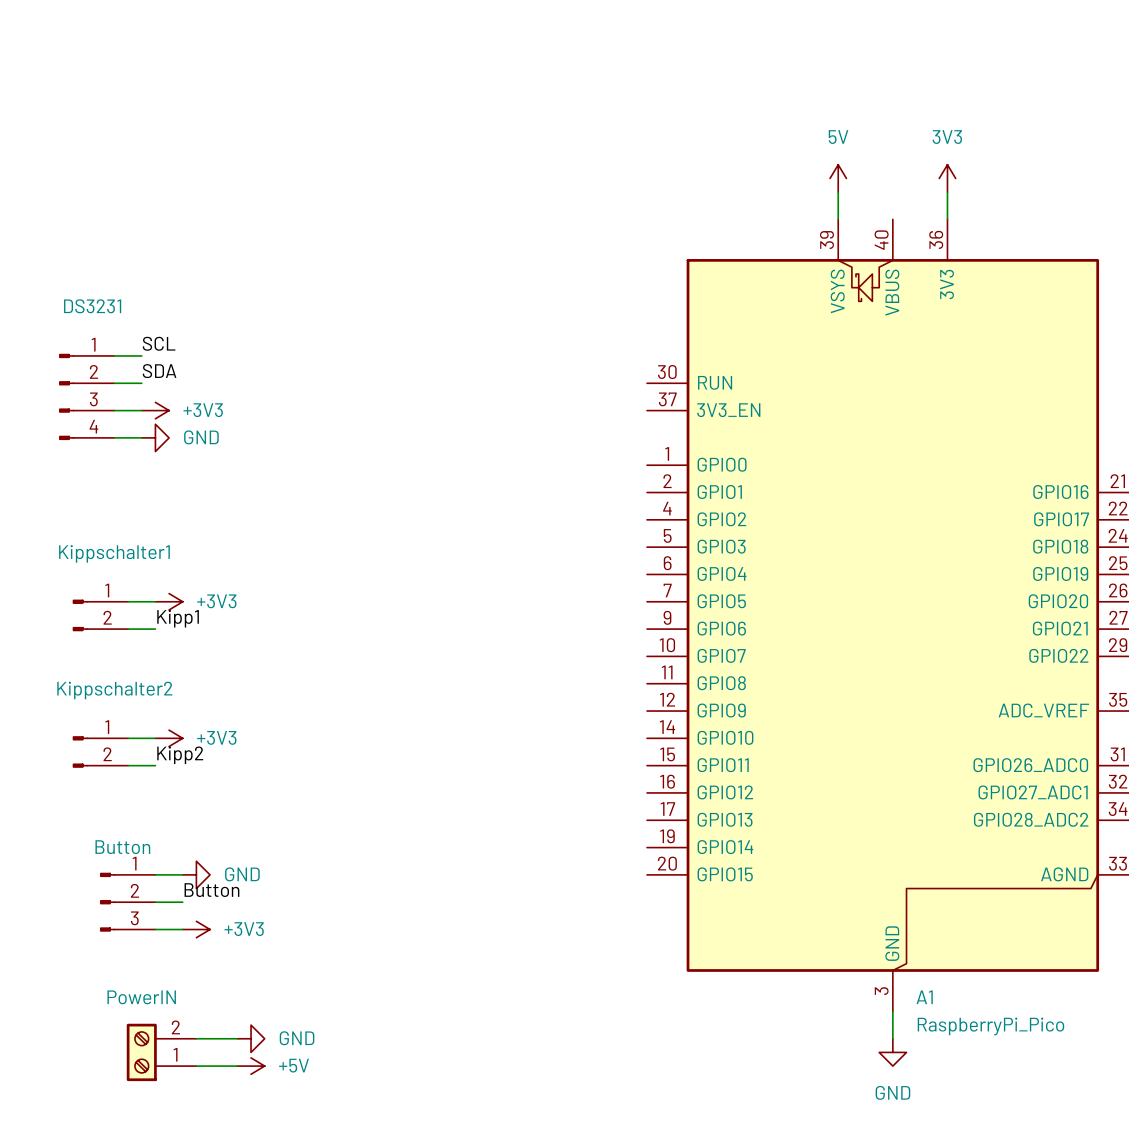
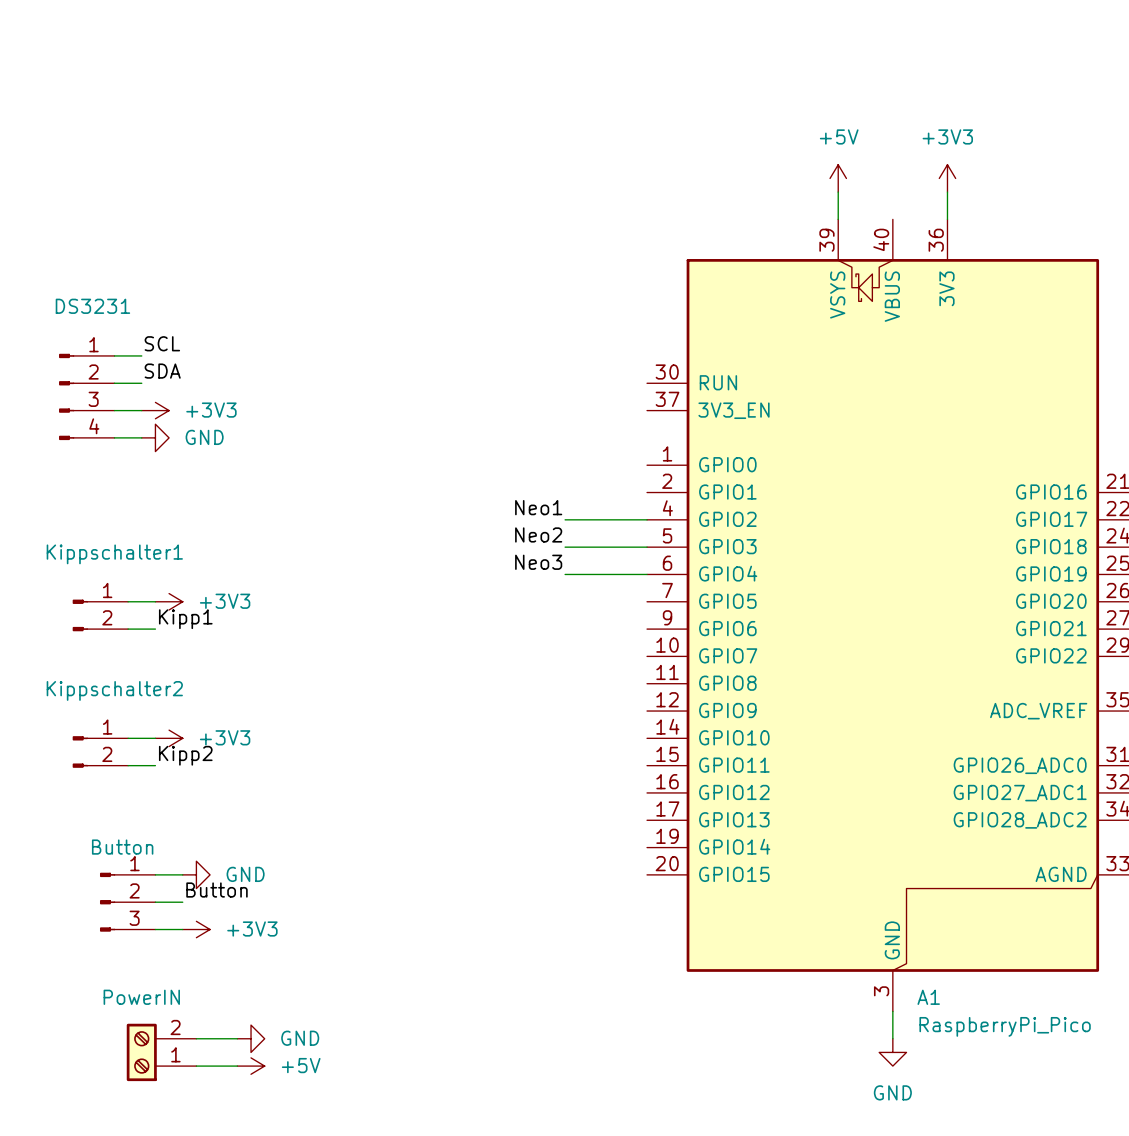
power symbol: 5V (838, 178) -> +5V (838, 178)
power symbol: 3V3 (947, 178) -> +3V3 (947, 178)
label: none -> Neo1 (538, 507)
wire: none -> (565, 519) (647, 519)
label: none -> Neo2 (538, 534)
wire: none -> (565, 547) (647, 547)
label: none -> Neo3 (538, 562)
wire: none -> (565, 574) (647, 574)

